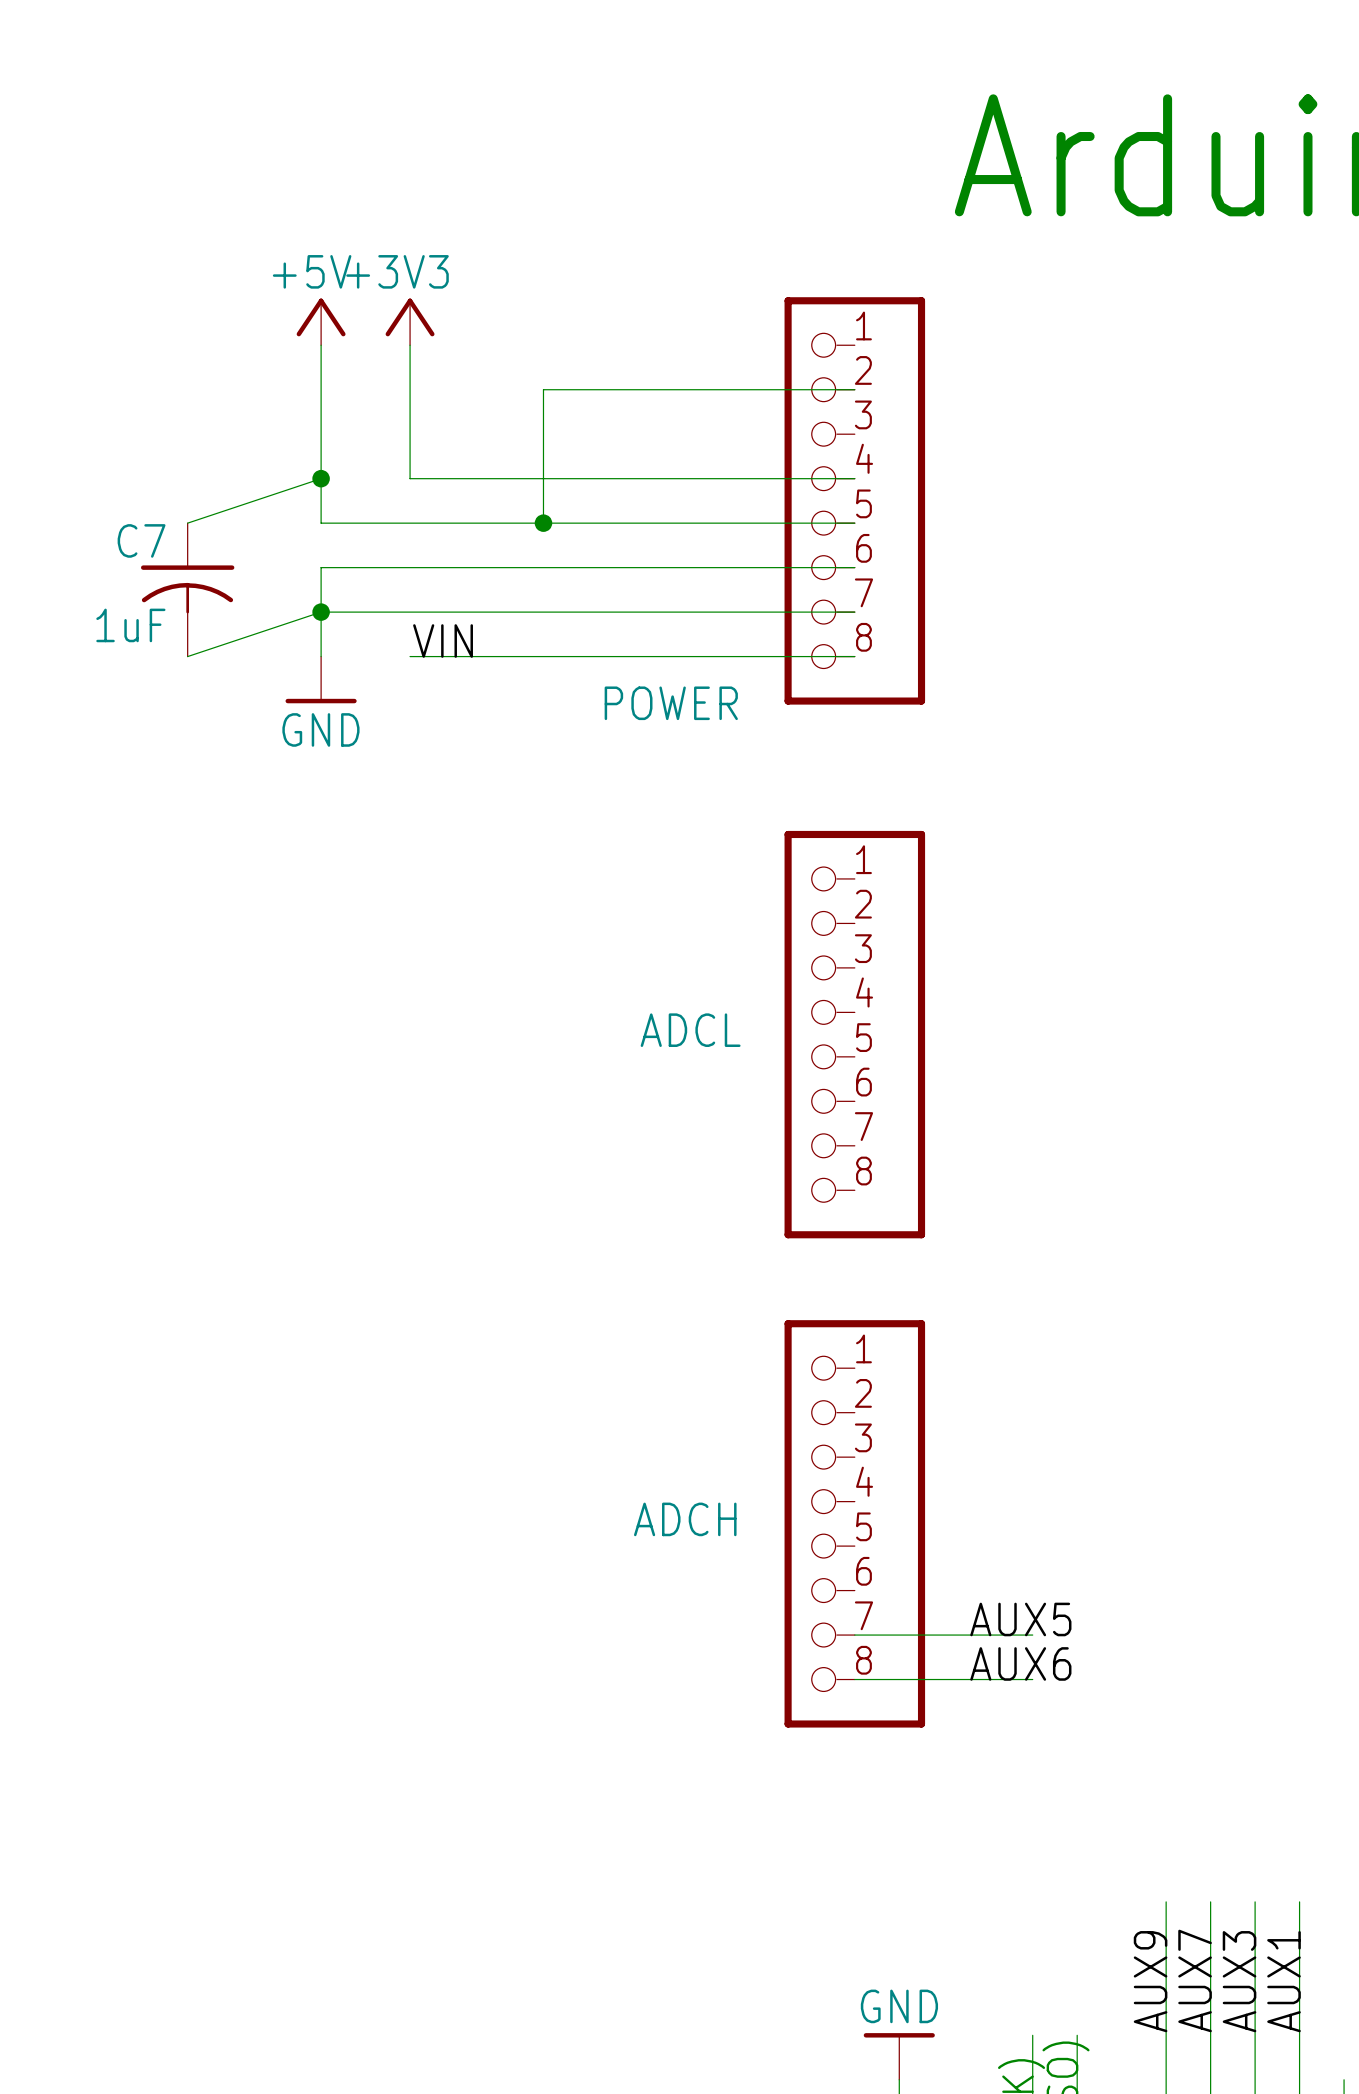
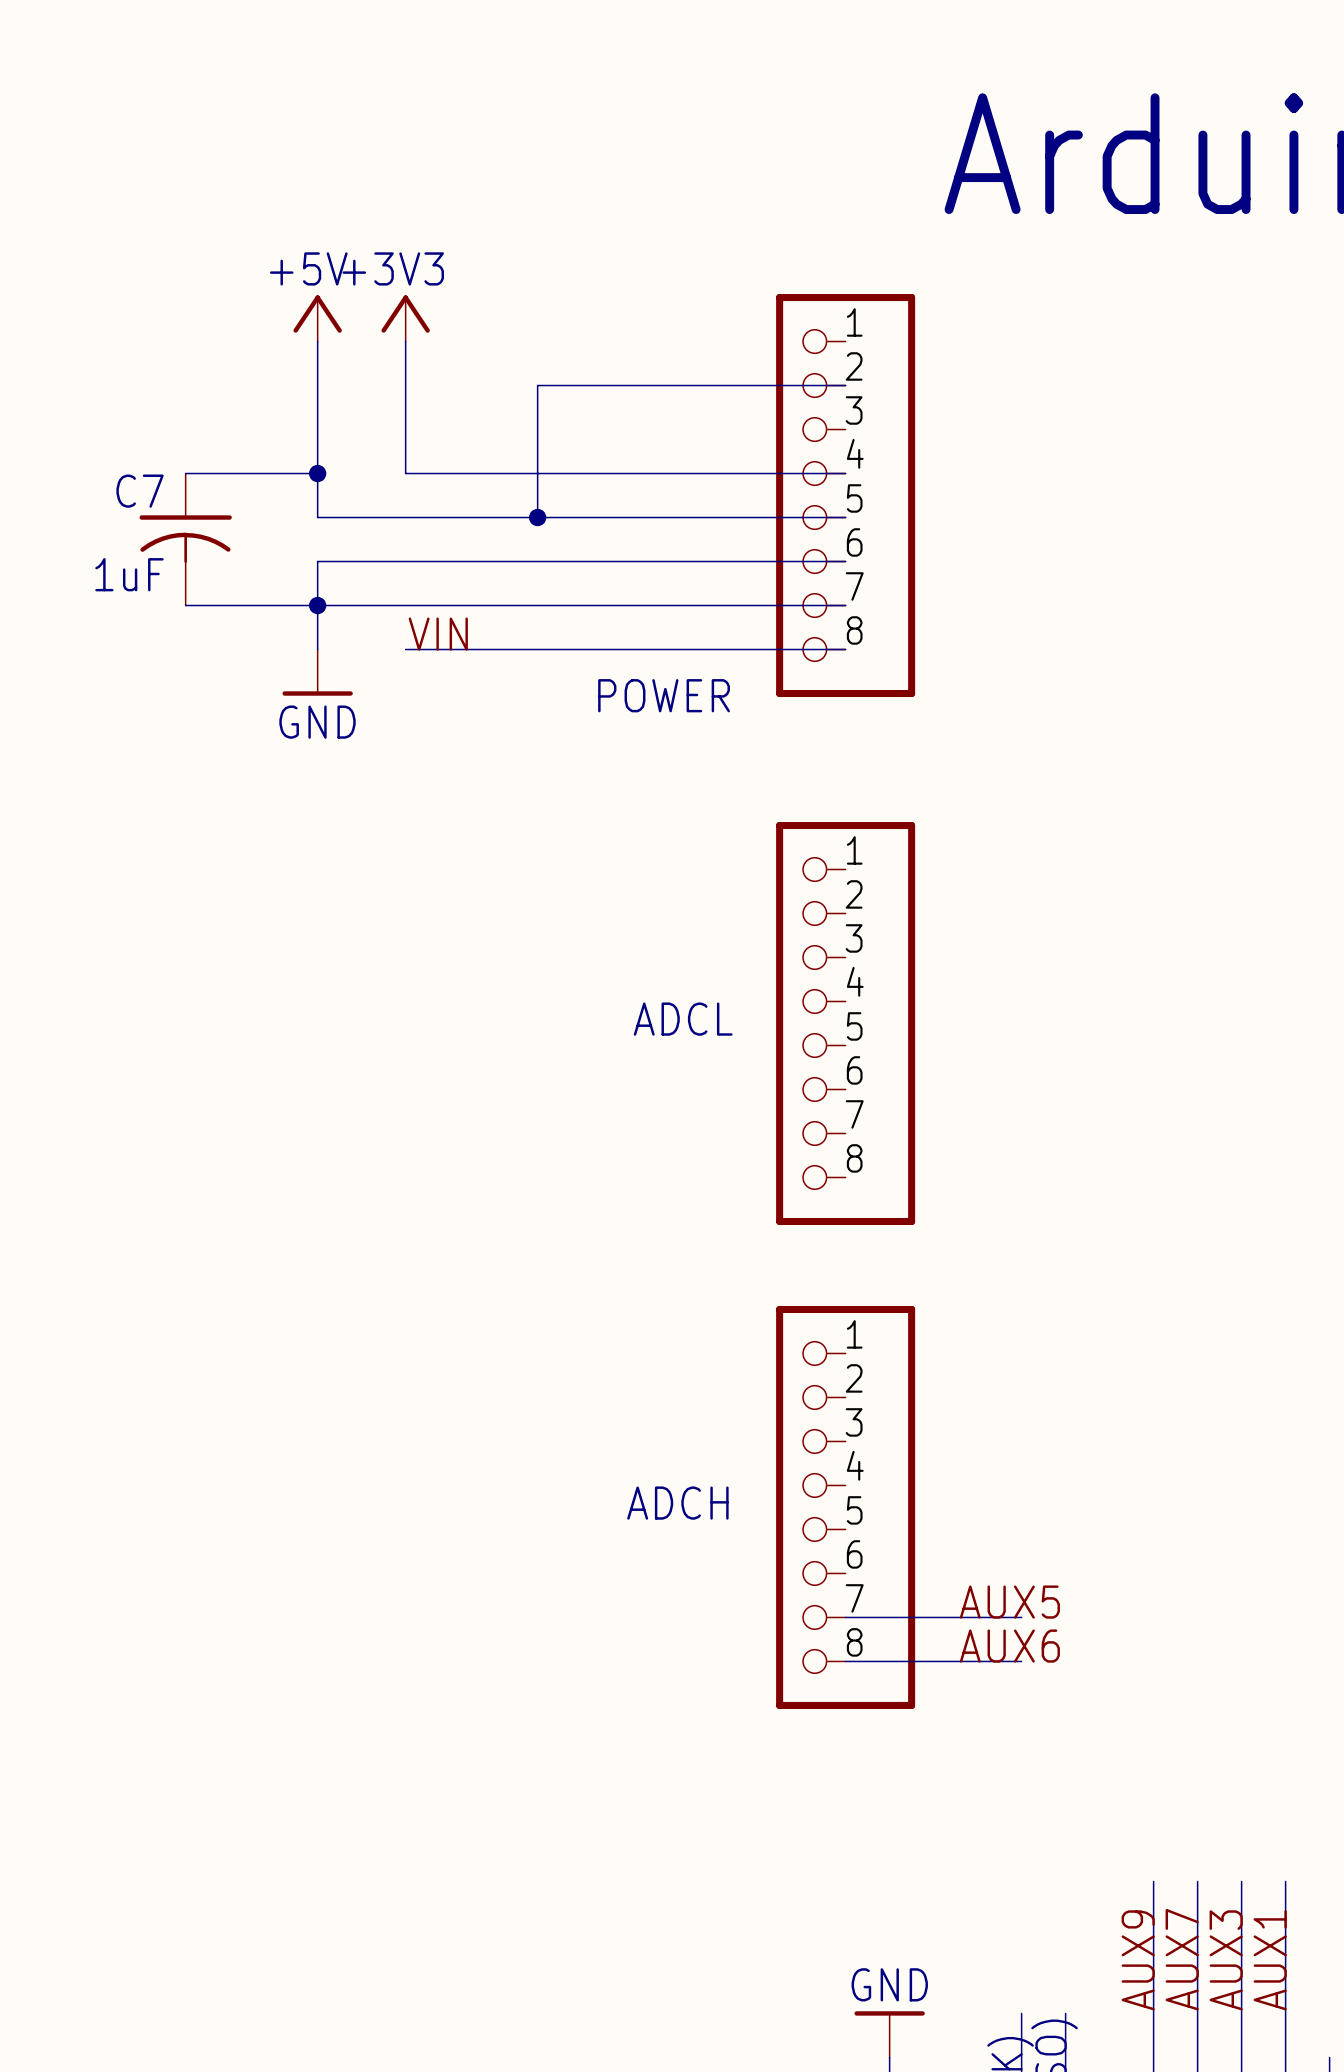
wire: (321, 478) (187, 523) -> (317, 473) (185, 473)
C7 position: (187, 589) -> (185, 539)
wire: (321, 612) (187, 656) -> (317, 605) (185, 605)

